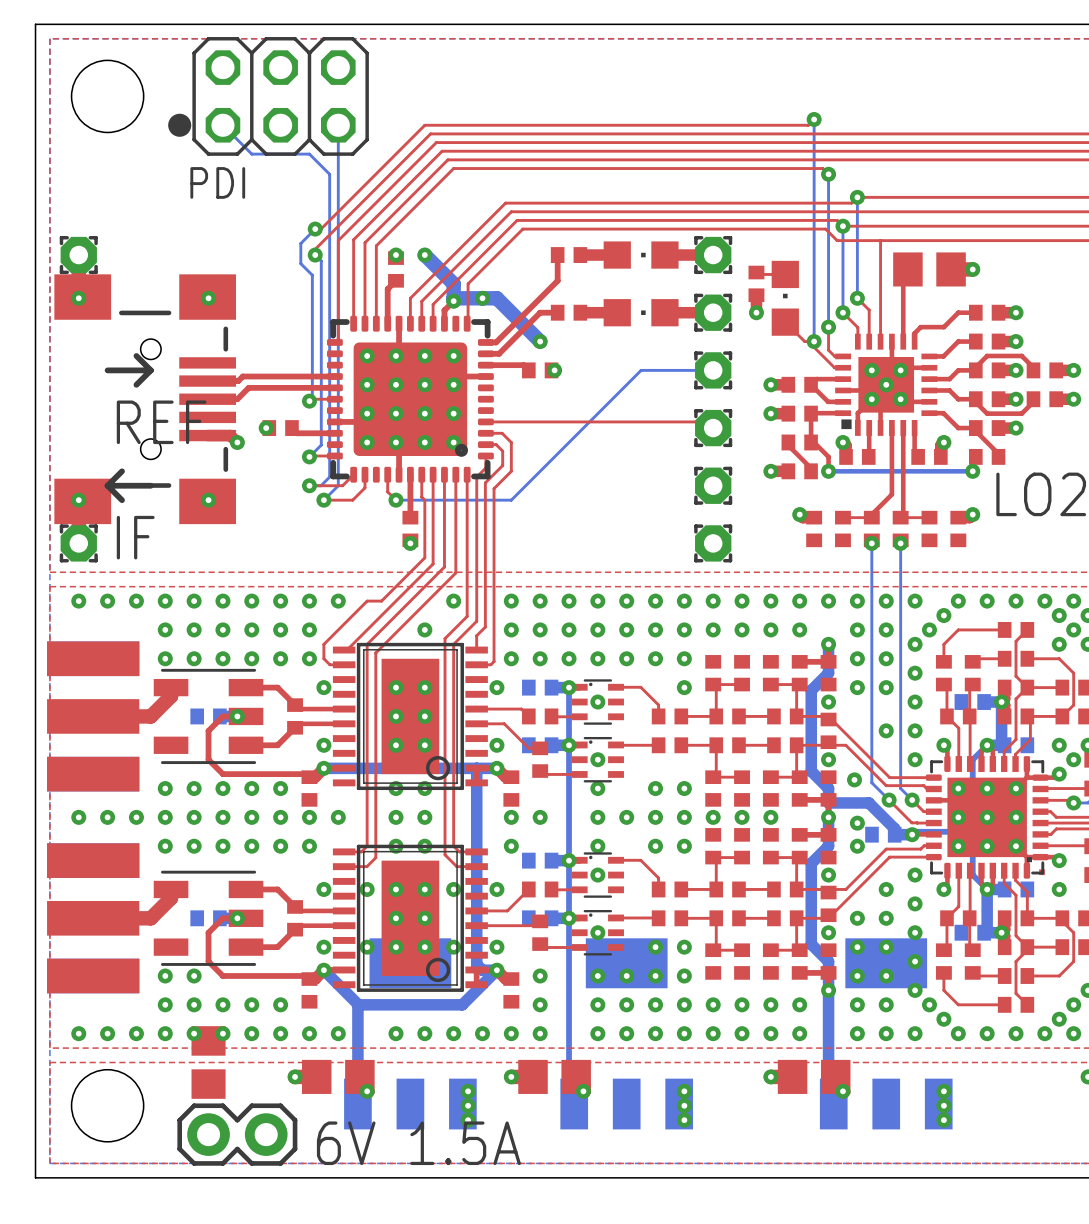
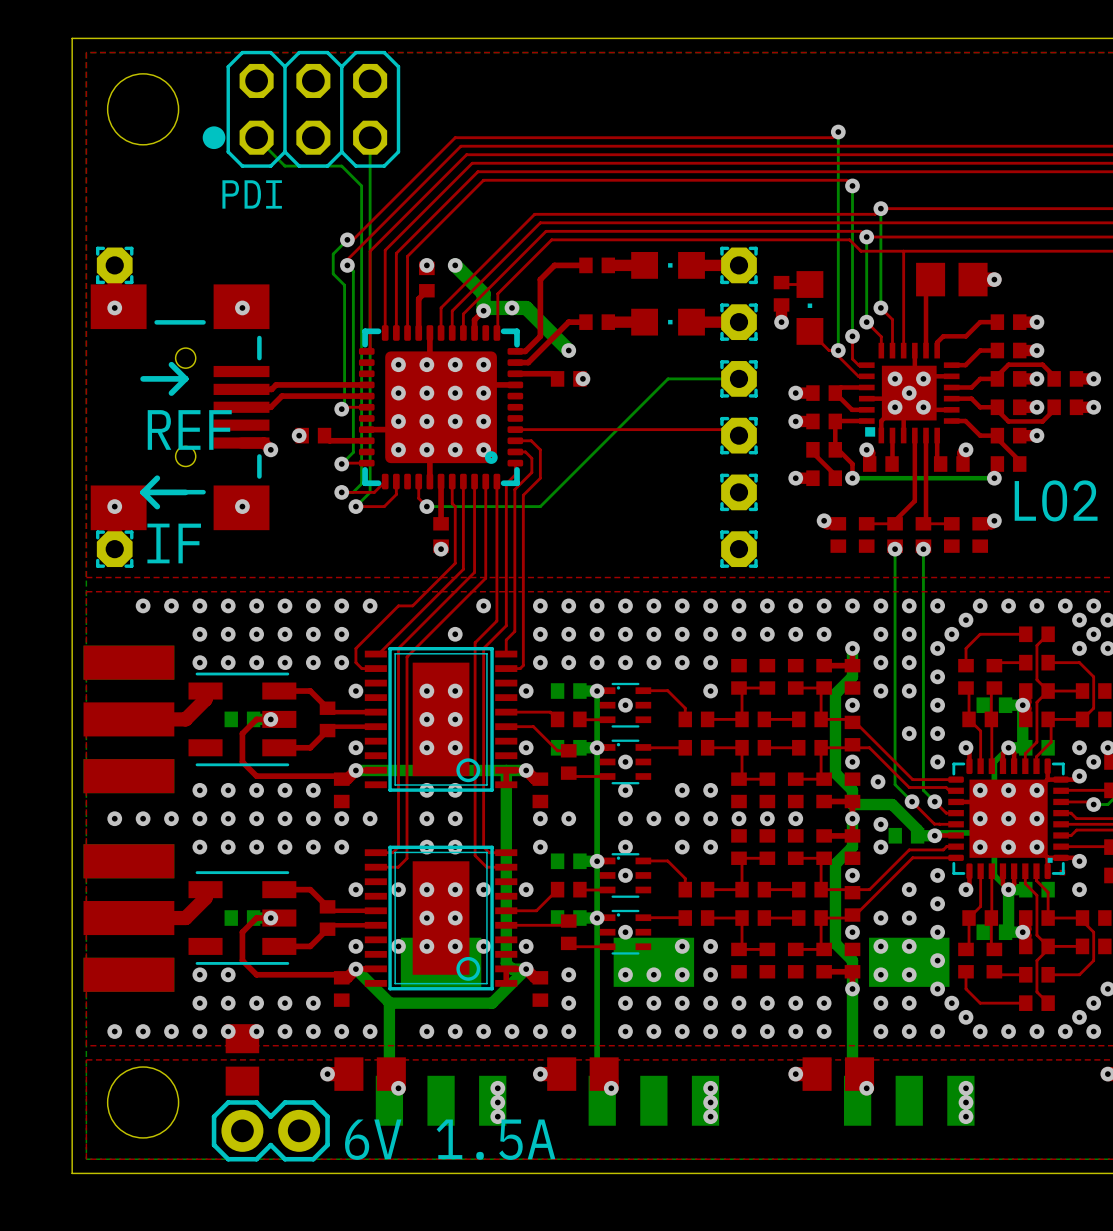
top track: (557, 255) (557, 280) (511, 327) -> (585, 265) (554, 265) (540, 279) (540, 336)
via: (78, 601) -> none

